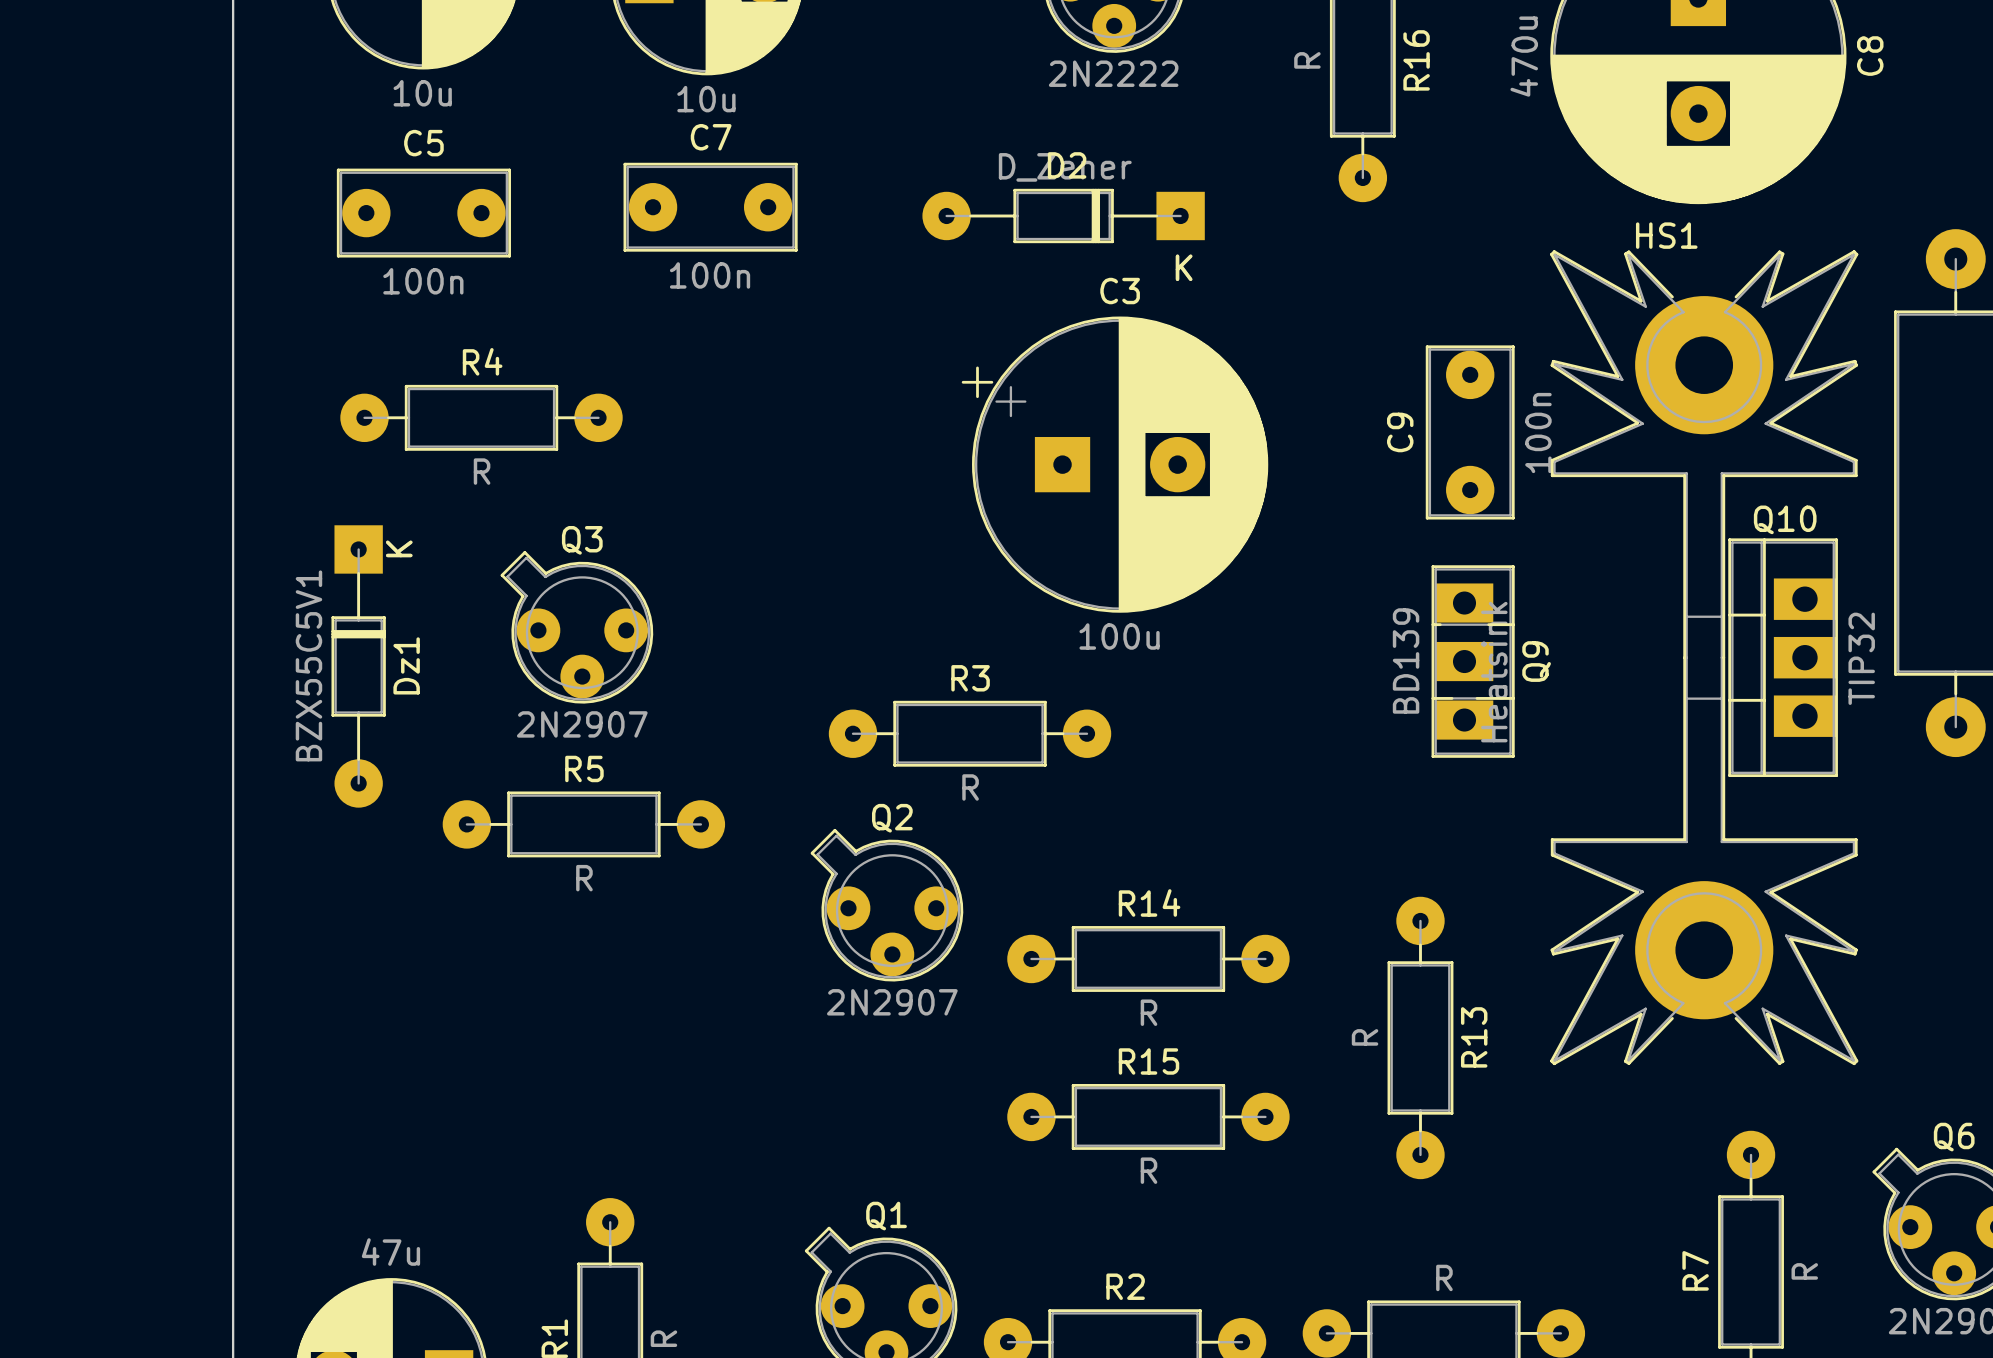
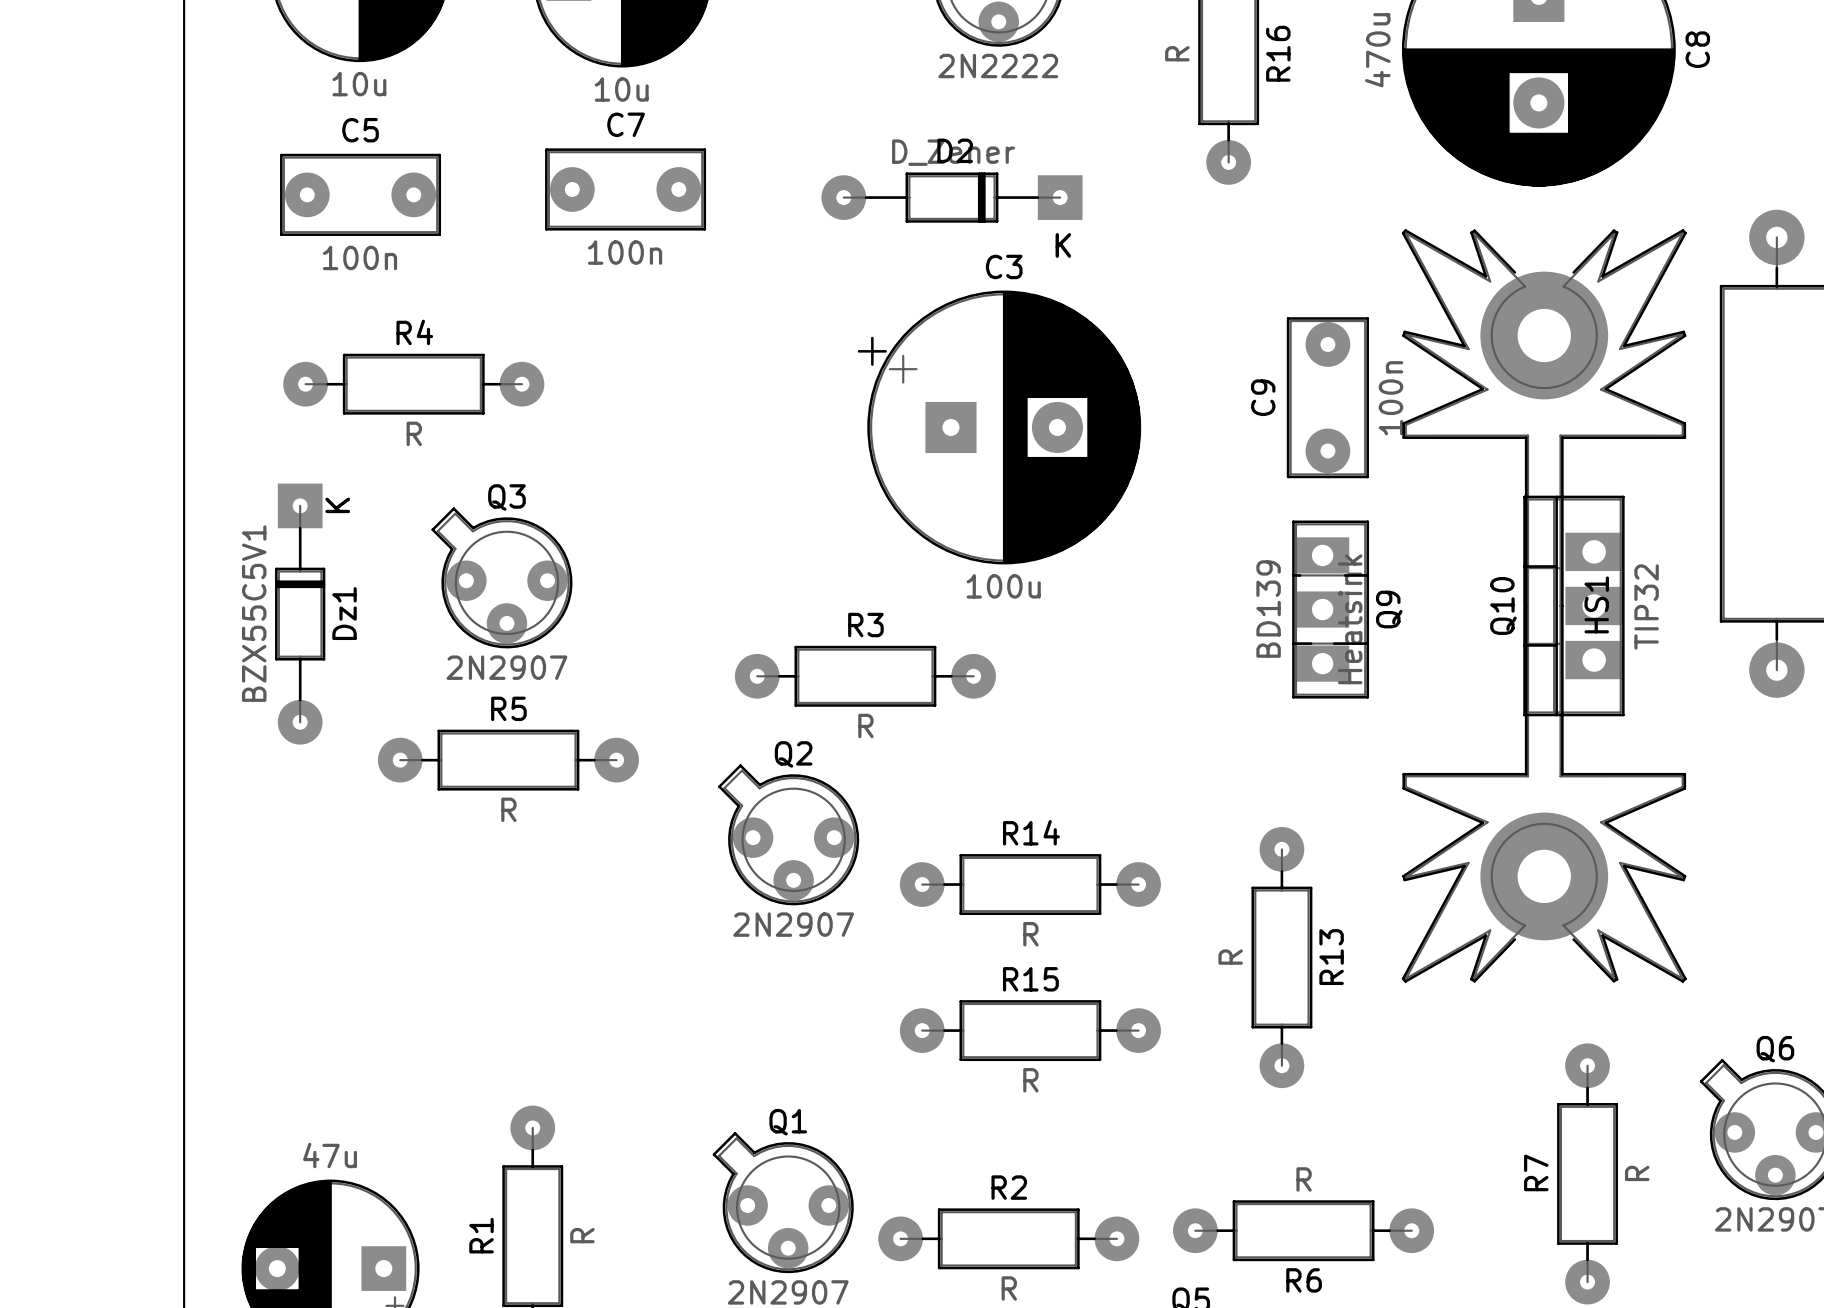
HS1 name rotation: 0° (1666, 235) -> 90° counterclockwise (1596, 604)
HS1 name position: HS1 (1666, 235) -> HS1 (1596, 604)
Q10 name rotation: 0° (1785, 519) -> 90° counterclockwise (1503, 605)
Q10 name position: Q10 (1785, 519) -> Q10 (1503, 605)
Q10 position: (1783, 657) -> (1573, 605)

